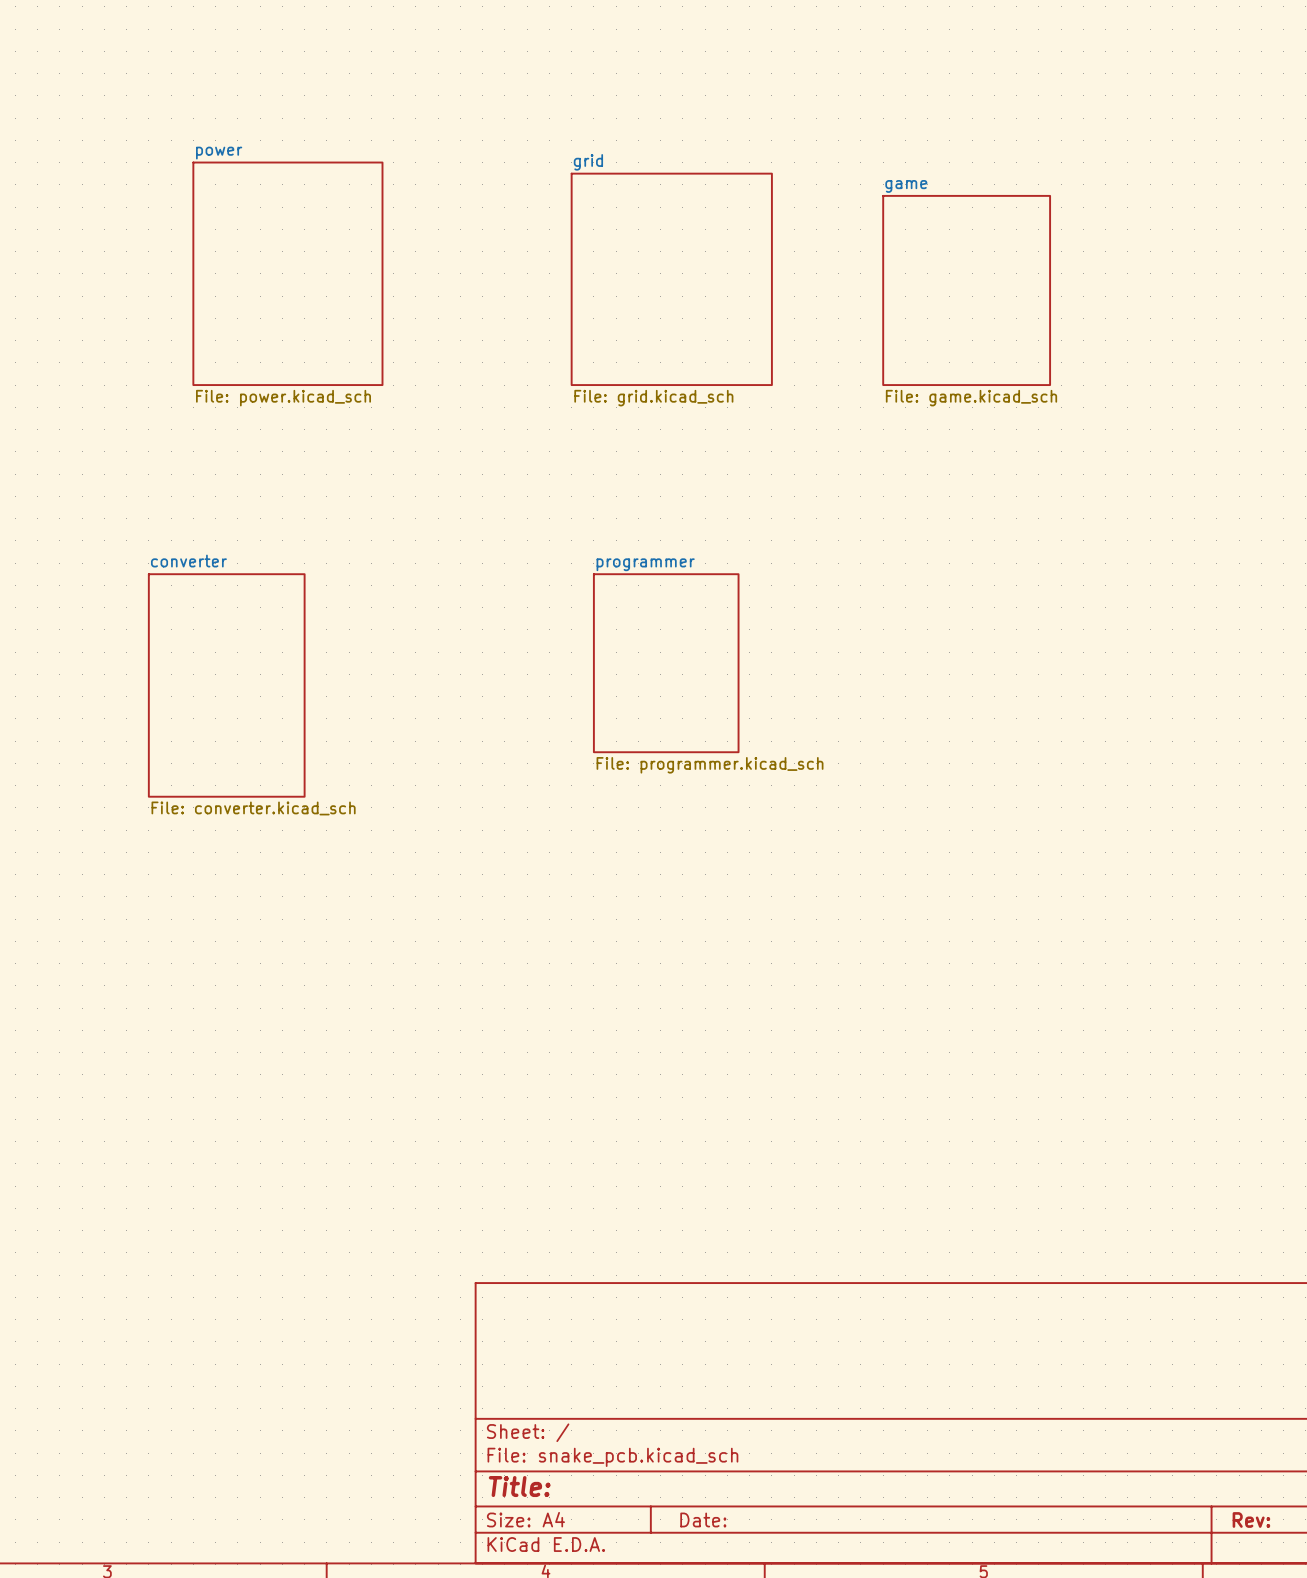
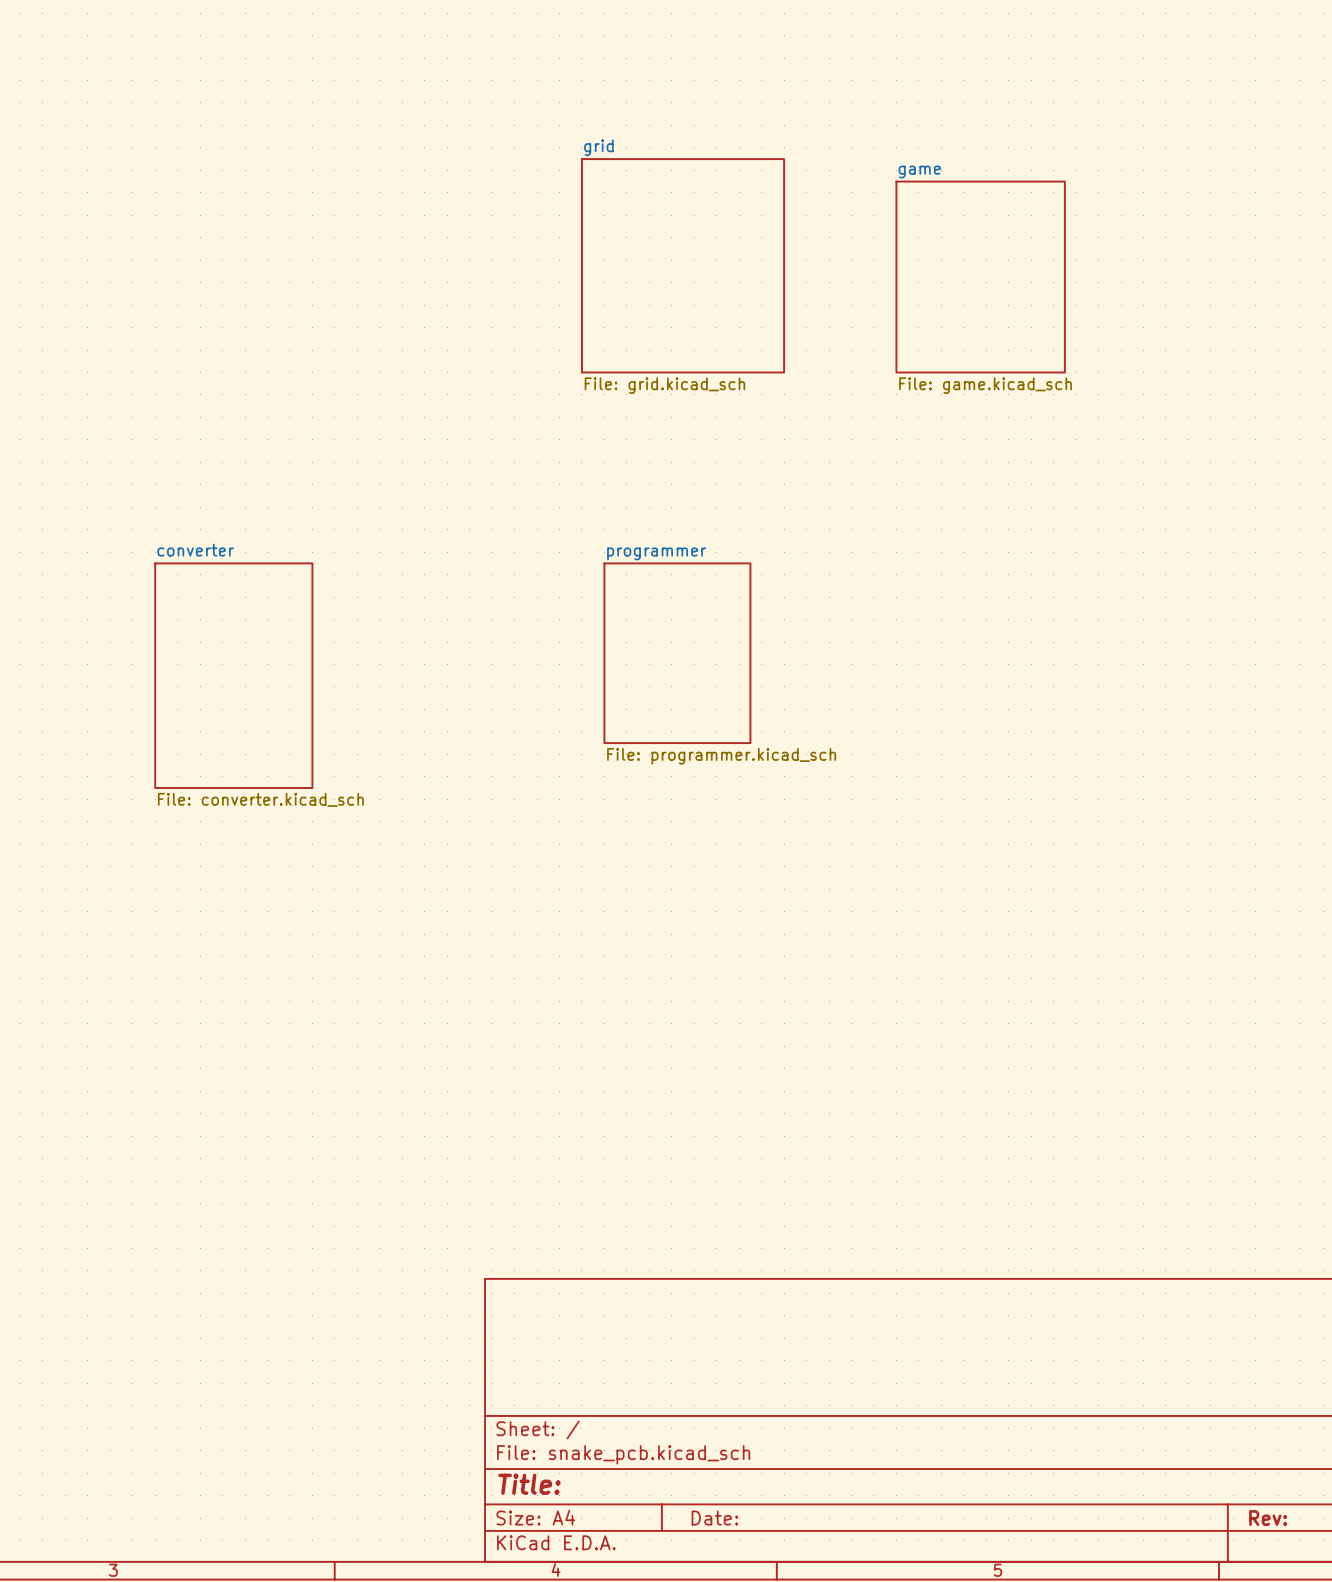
sheet power: File: power.kicad_sch (287, 273) -> none

